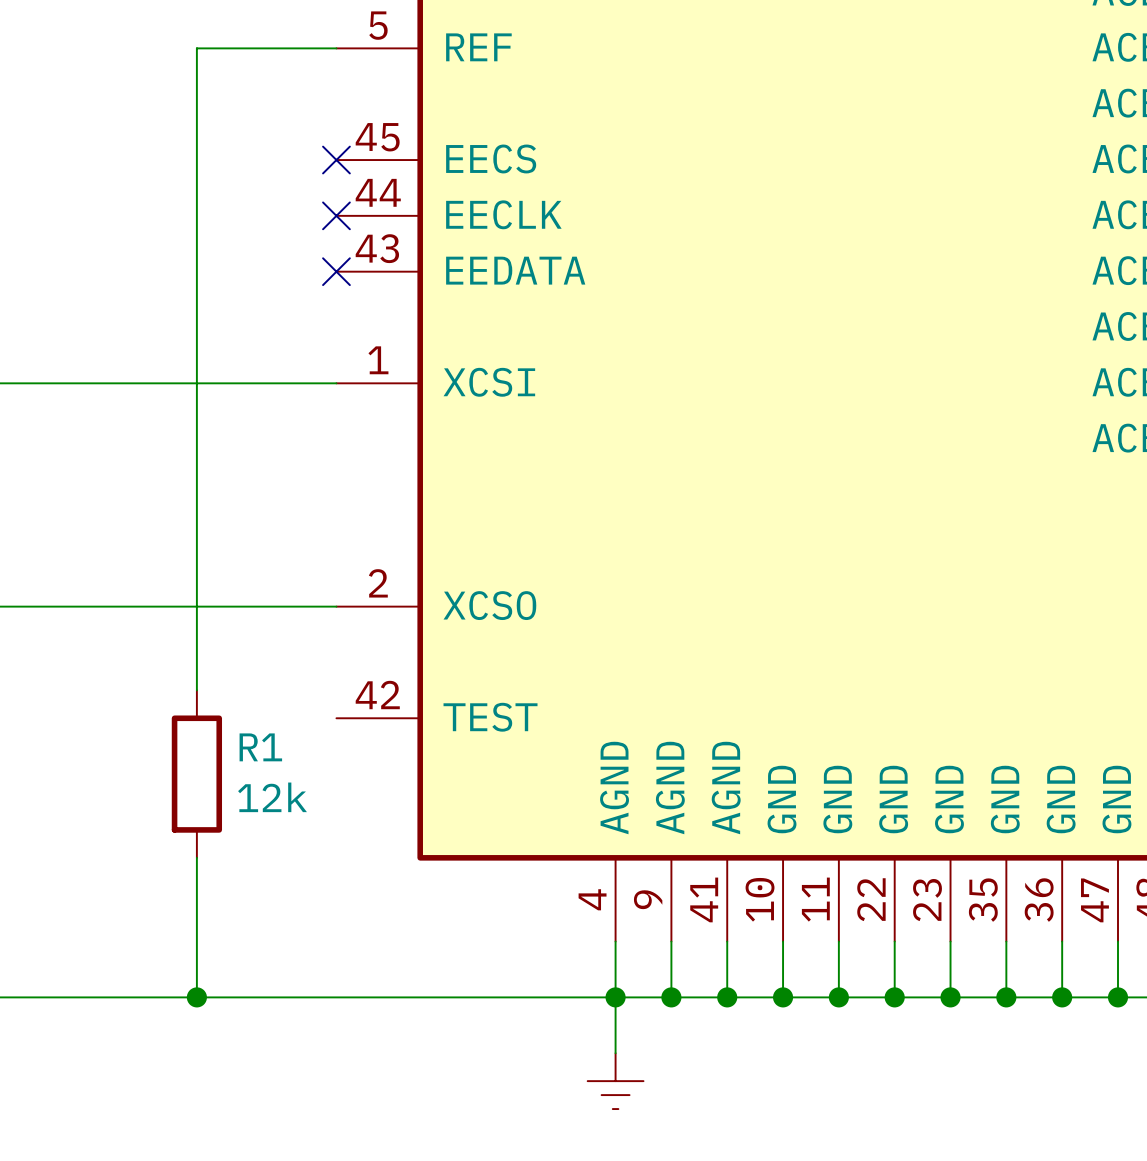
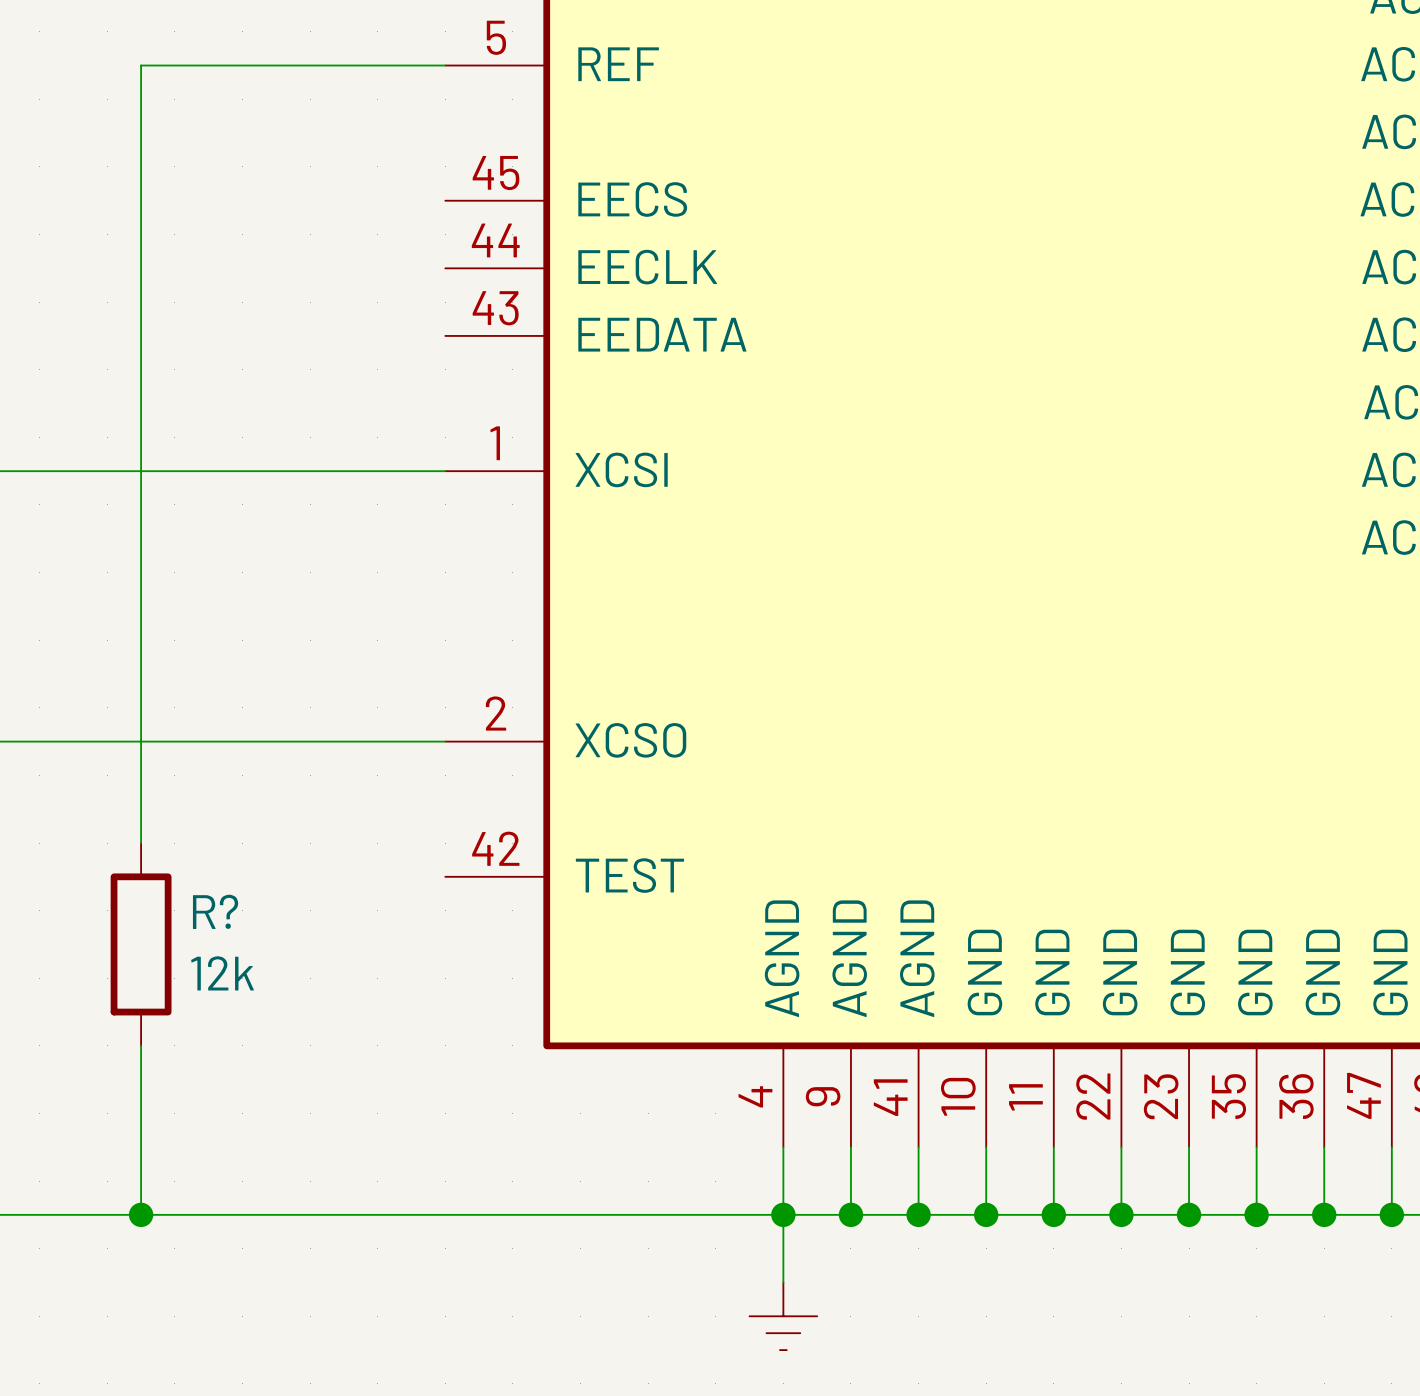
wire: (196, 48) (196, 690) -> (276, 65) (141, 65) (141, 843)
no-connect mark: (336, 160) -> none
no-connect mark: (336, 215) -> none
no-connect mark: (336, 271) -> none
R?: none -> 12k (141, 944)
R1: 12k (196, 774) -> none
wire: (196, 857) (196, 997) -> (141, 1045) (141, 1214)
junction position: (196, 997) -> (141, 1214)

